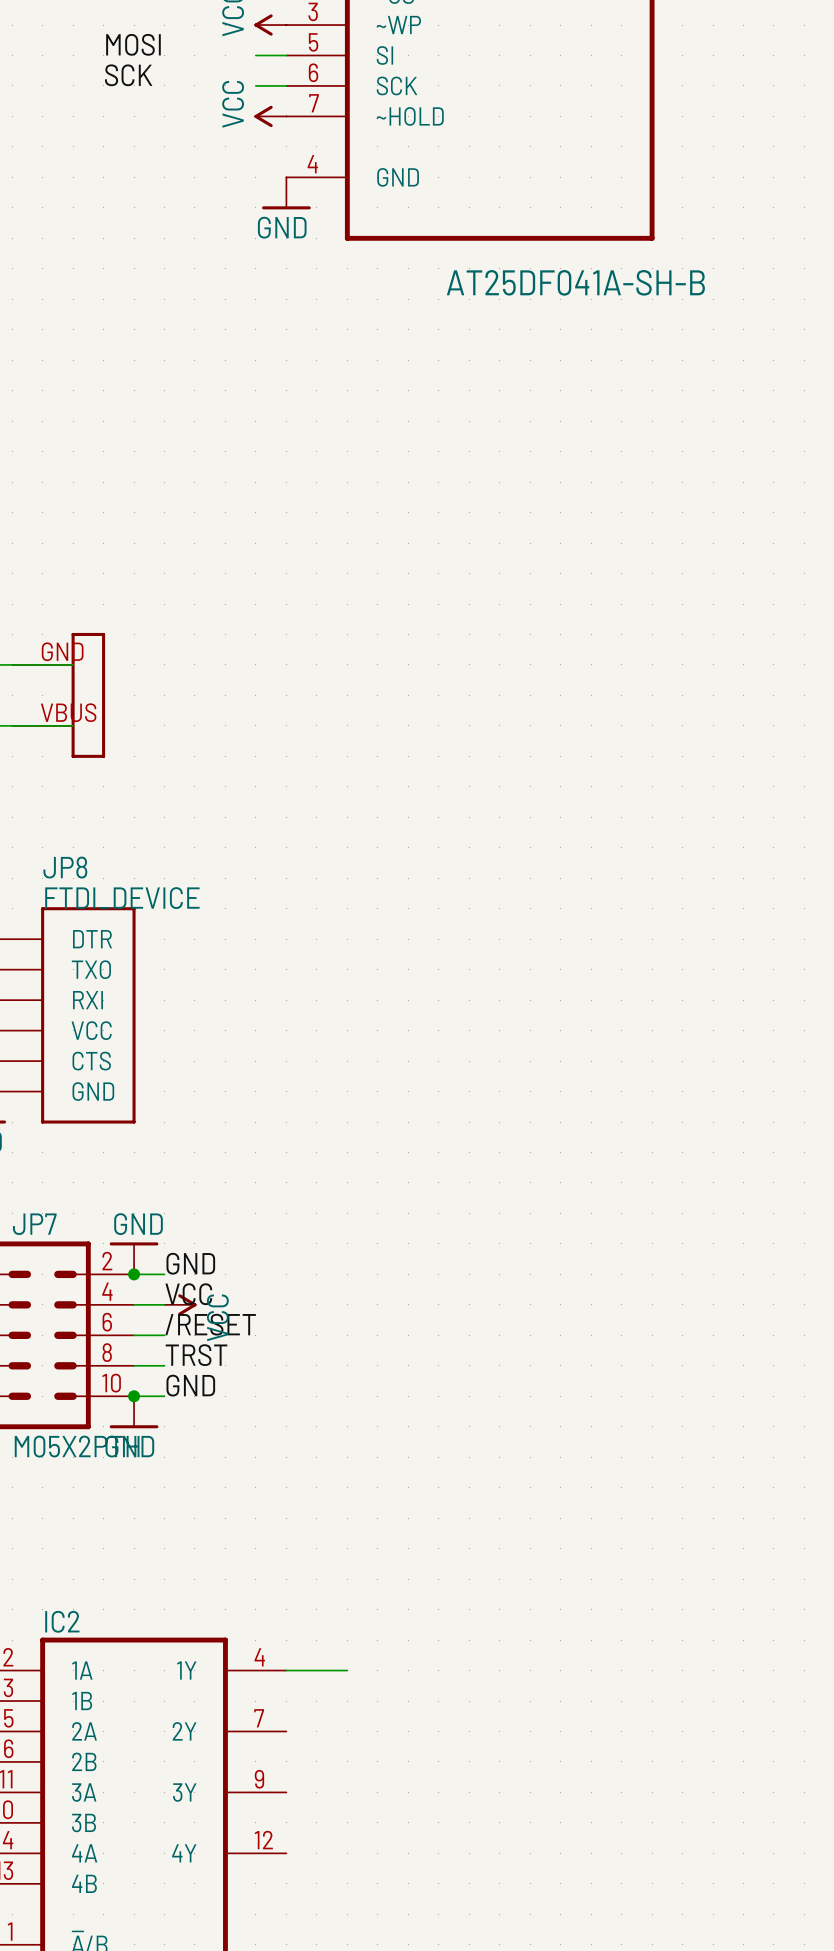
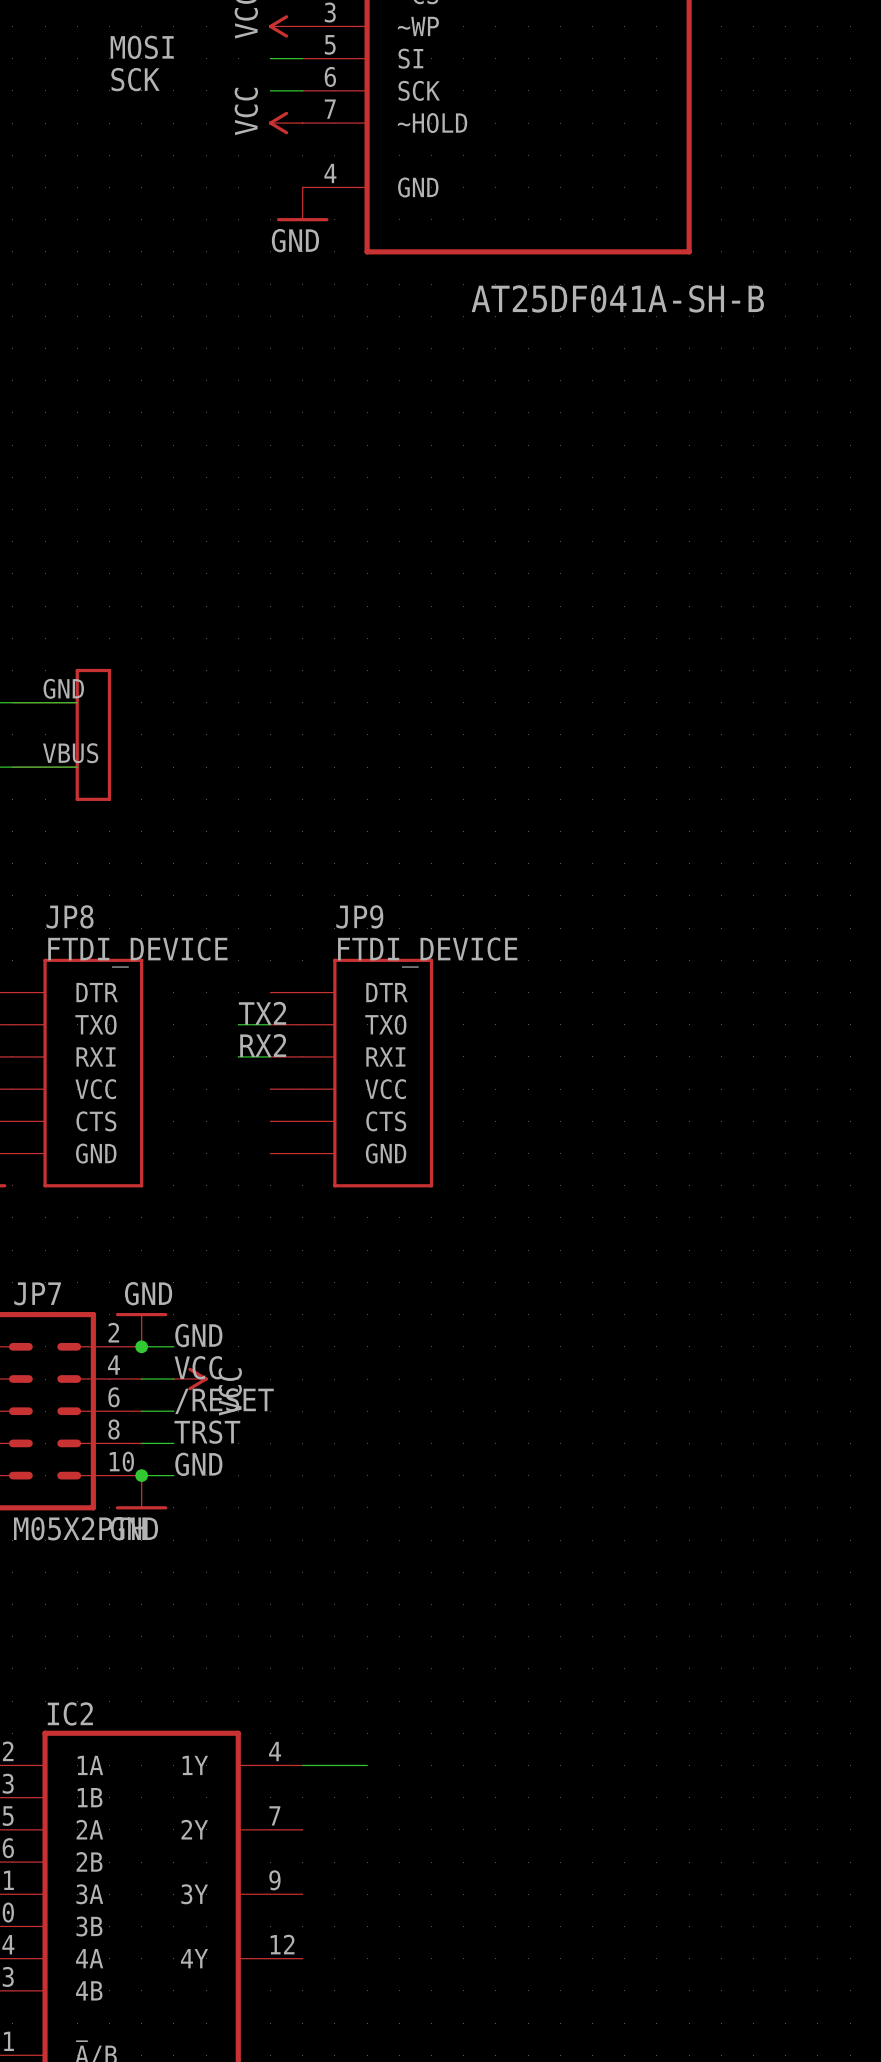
label: none -> TX2 (262, 1013)
wire: none -> (238, 1024) (270, 1024)
label: none -> RX2 (263, 1045)
wire: none -> (238, 1056) (270, 1056)
JP9: none -> FTDI_DEVICE (351, 1073)

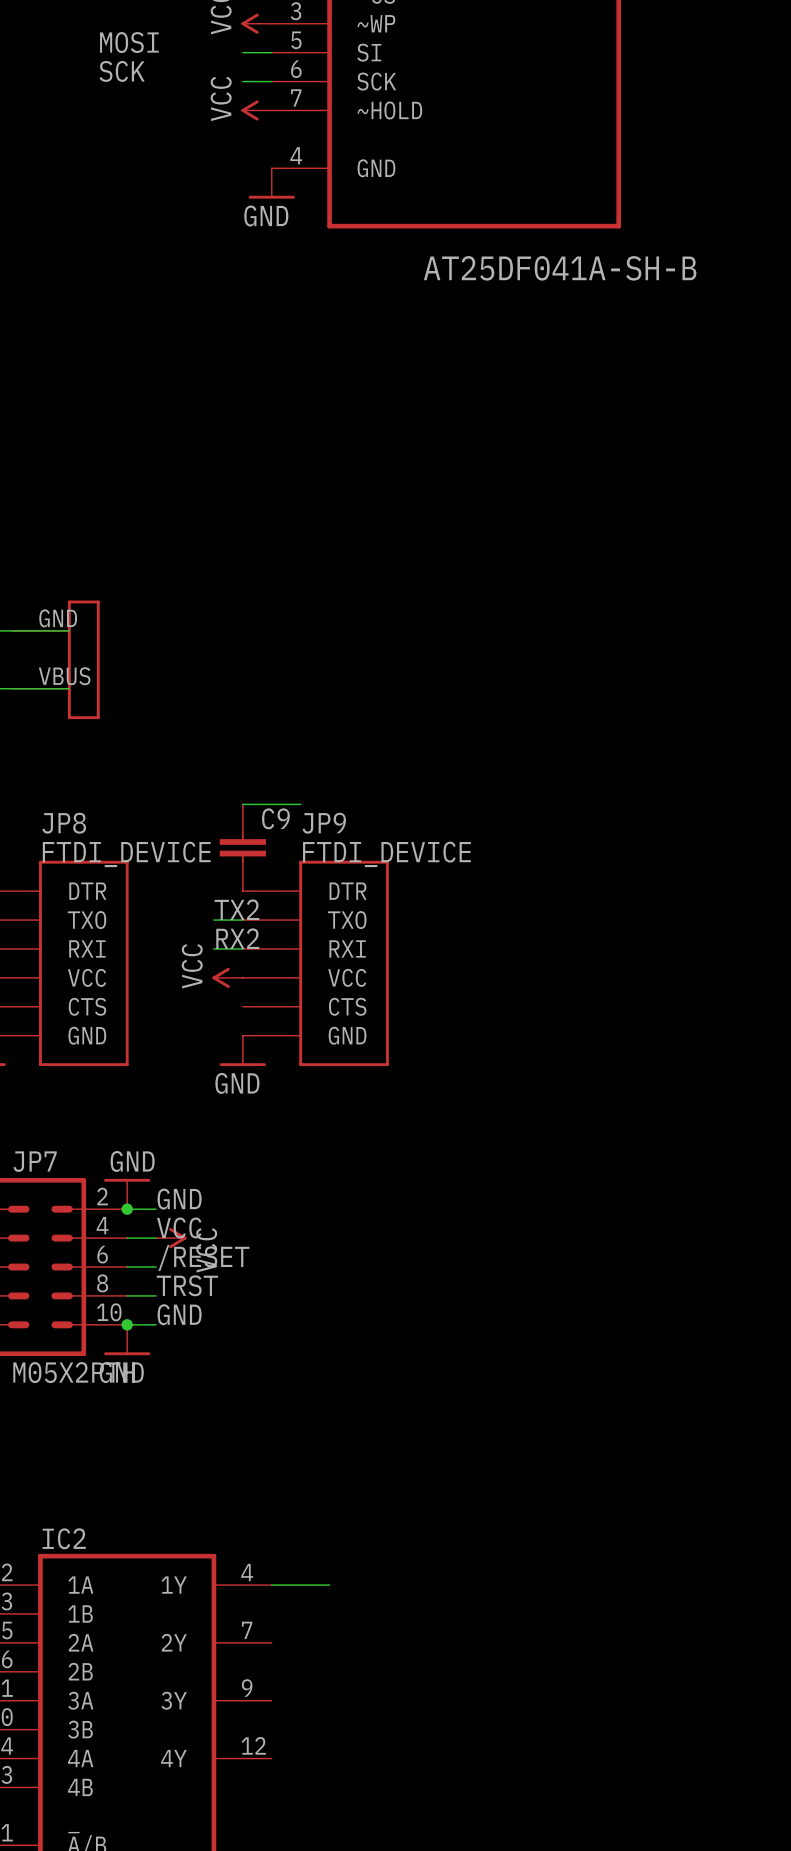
wire: none -> (242, 804) (300, 804)
C9: none -> (242, 847)
power symbol: none -> VCC (227, 977)
power symbol: none -> GND (242, 1050)

